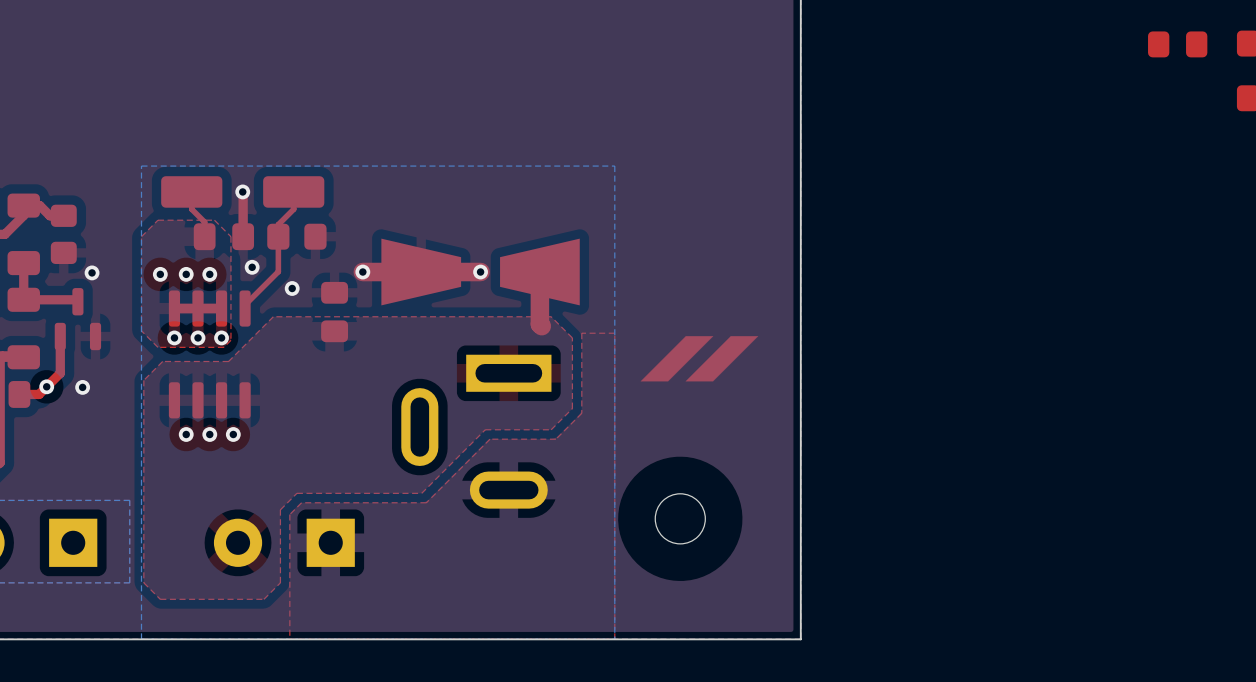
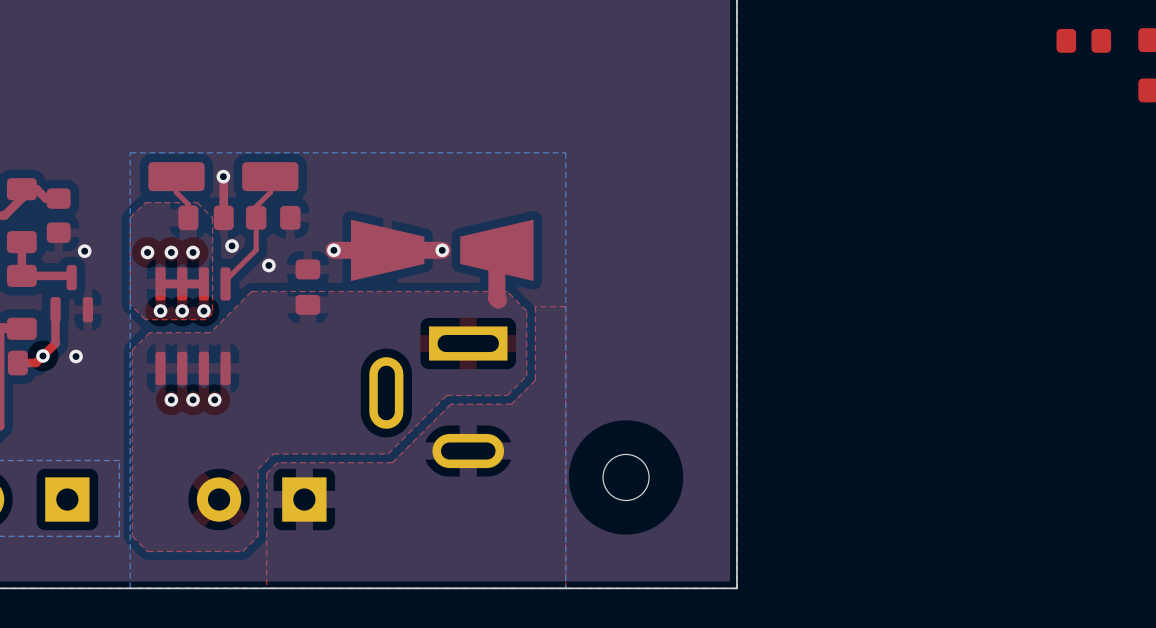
drawing: [640, 336, 759, 382] -> none

